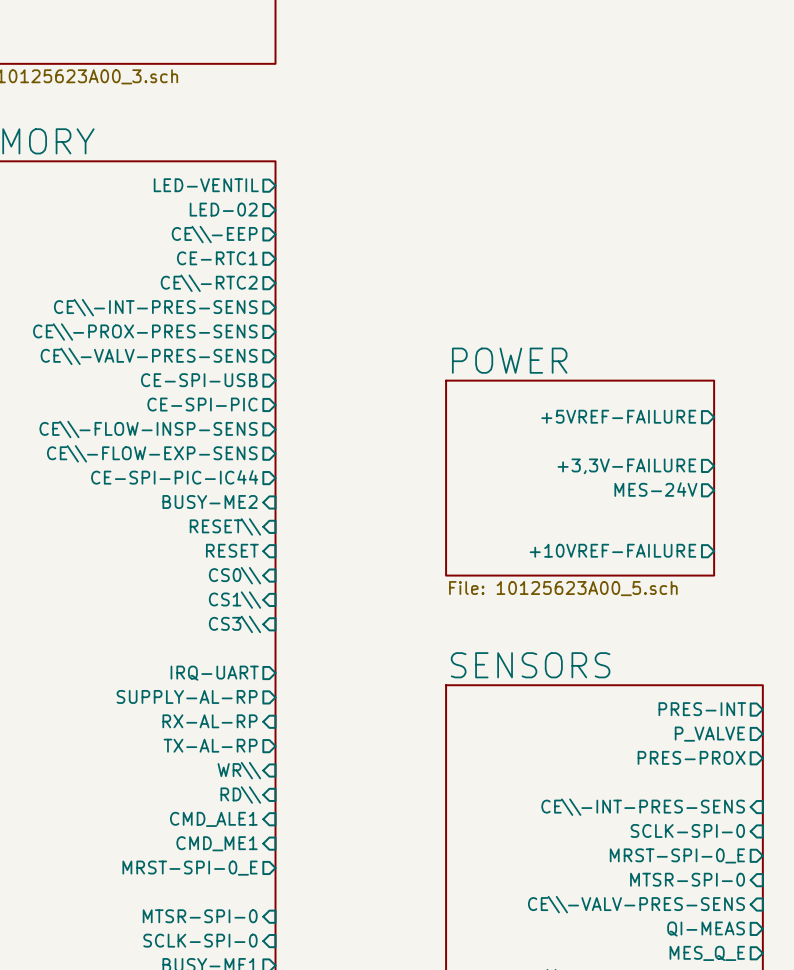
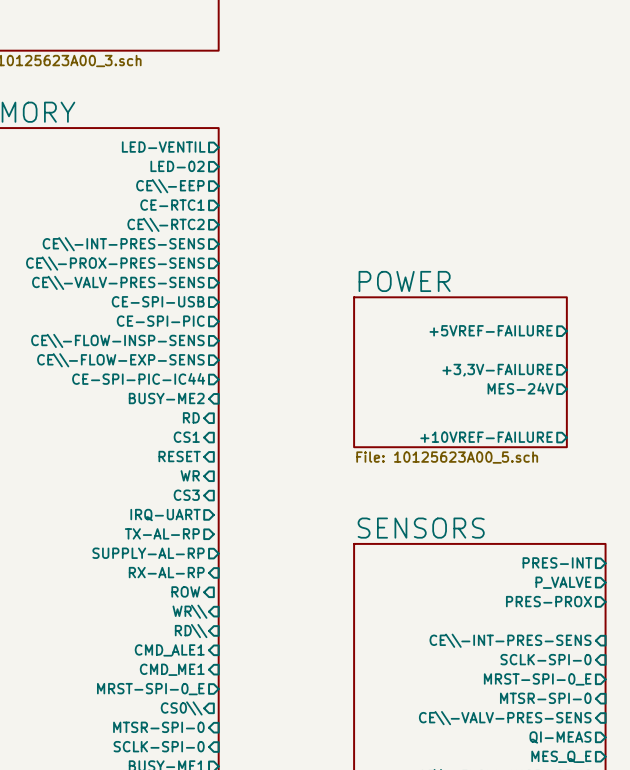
sheet POWER shape: [446, 380, 715, 576] -> [354, 297, 567, 448]
sheet pin: RESET\\ (225, 526) -> RD (191, 417)
sheet pin position: RESET (232, 550) -> RESET (179, 456)
sheet pin: none -> CS1 (186, 437)
sheet pin: CS0\\ (234, 575) -> none
sheet pin: CS1\\ (234, 600) -> WR (190, 475)
sheet pin: CS3\\ (234, 624) -> CS3 (186, 495)
sheet pin position: IRQ-UART (214, 673) -> IRQ-UART (165, 515)
sheet pin position: TX-AL-RP (210, 745) -> TX-AL-RP (162, 533)
sheet pin: none -> ROW (185, 591)
sheet pin: none -> CS0\\ (181, 708)

